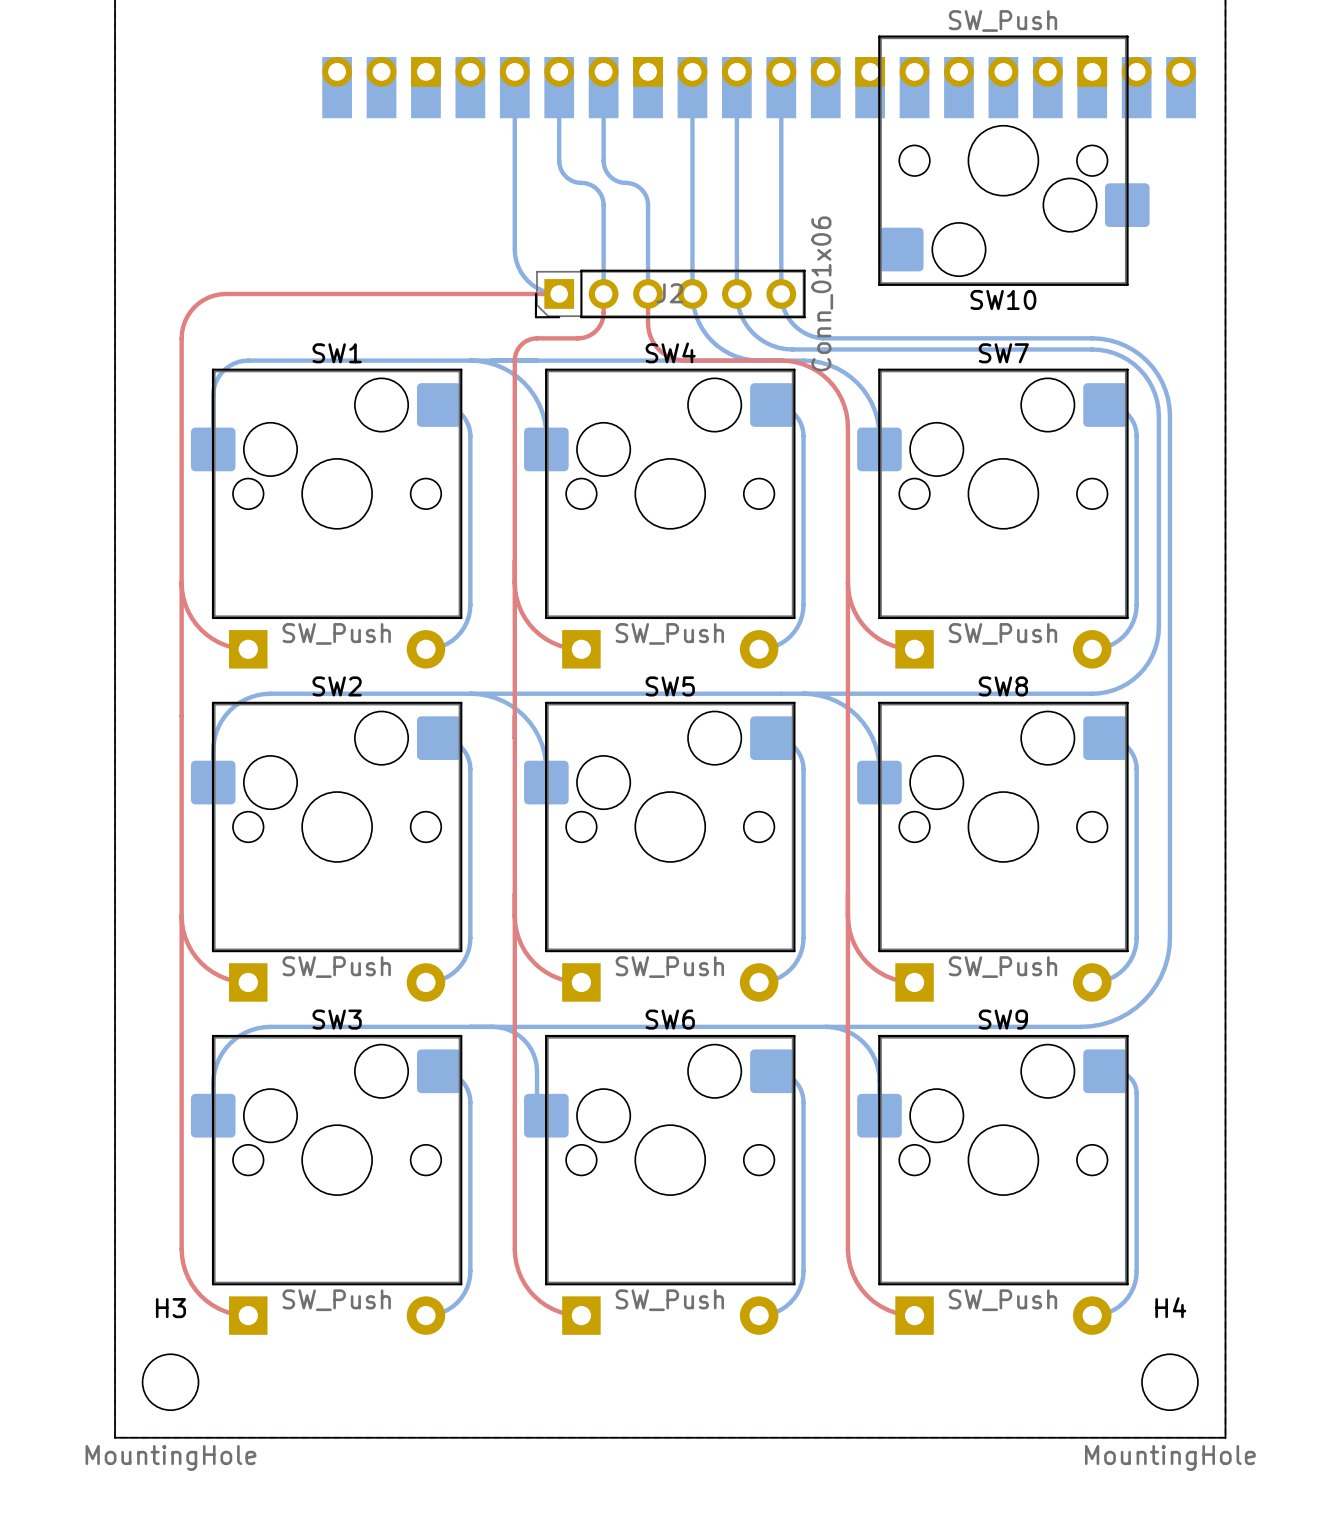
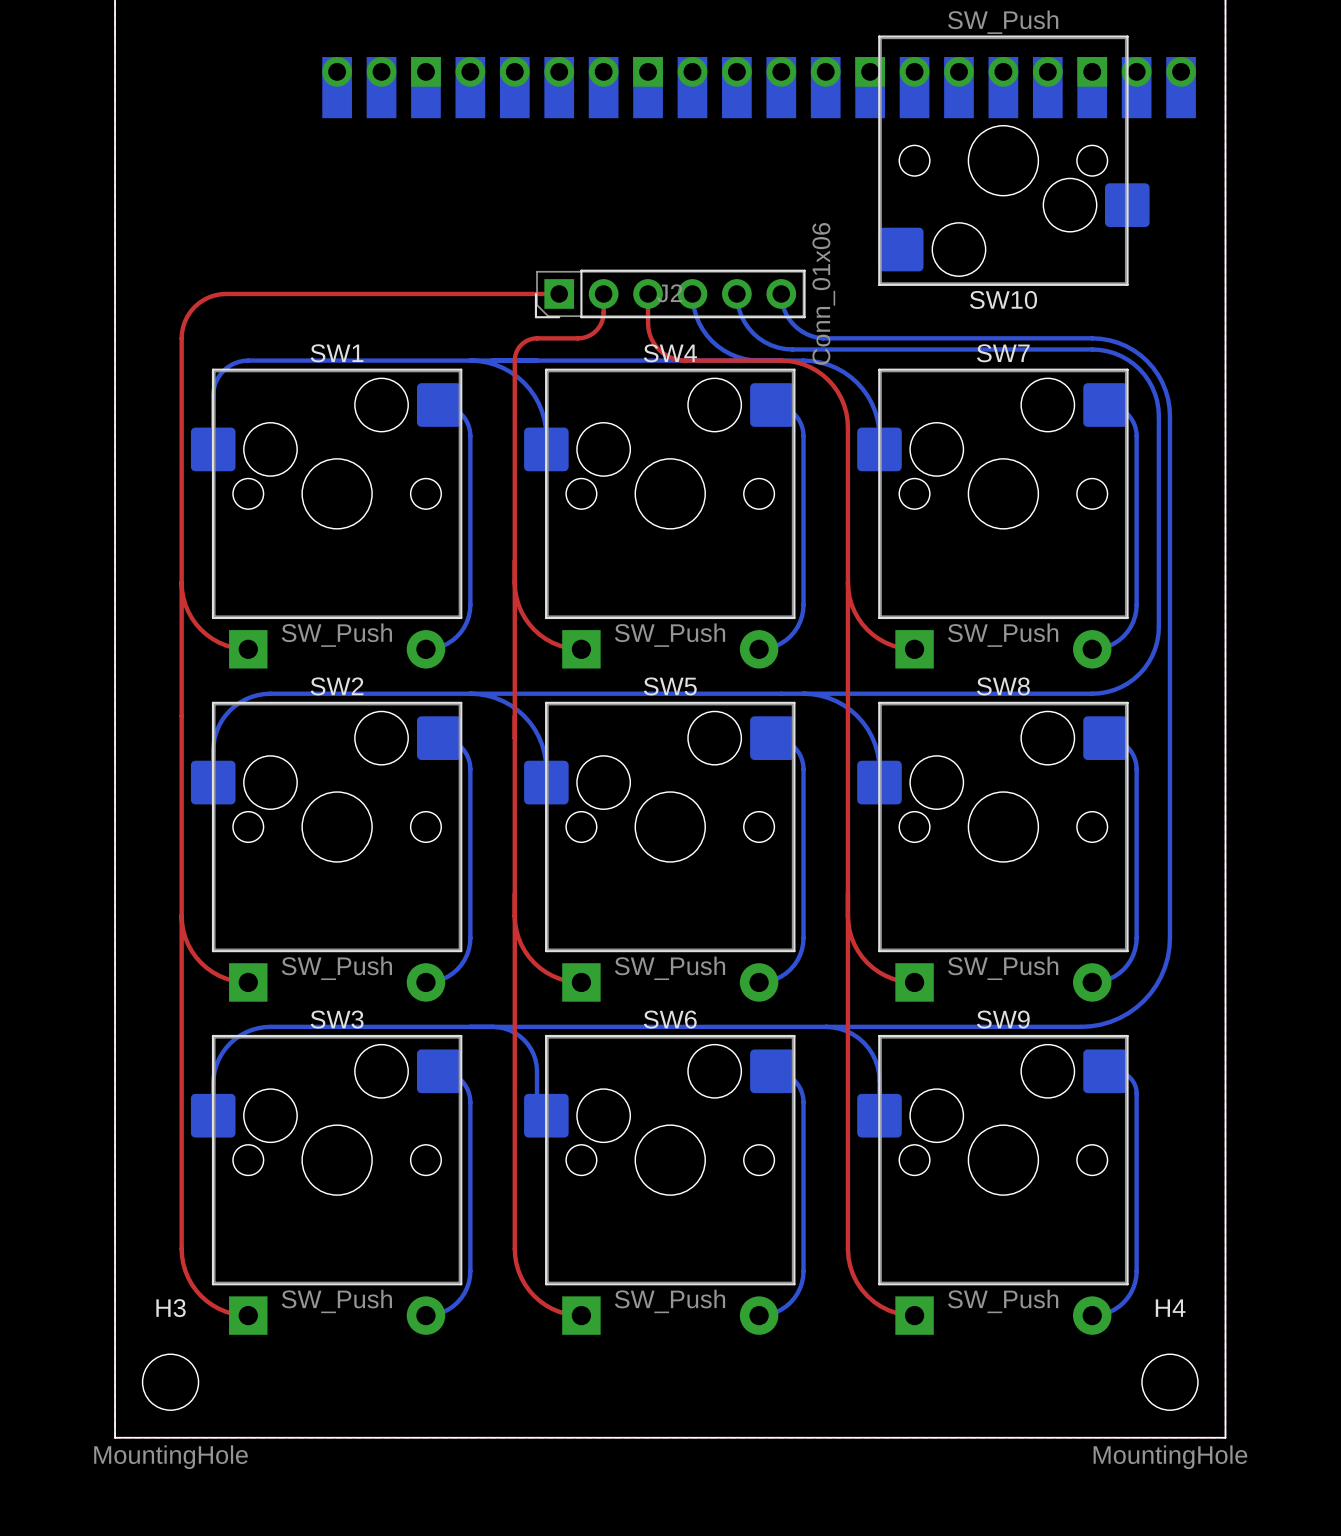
bottom track: (514, 71) (516, 261) (520, 271) (532, 284) (542, 290) (559, 293) -> none
bottom track: (559, 71) (559, 165) (567, 178) (593, 186) (602, 197) (603, 293) -> none
bottom track: (603, 71) (604, 168) (614, 179) (639, 187) (647, 200) (648, 293) -> none
bottom track: (692, 71) (692, 293) -> none
bottom track: (736, 71) (736, 293) -> none
bottom track: (781, 71) (781, 293) -> none

